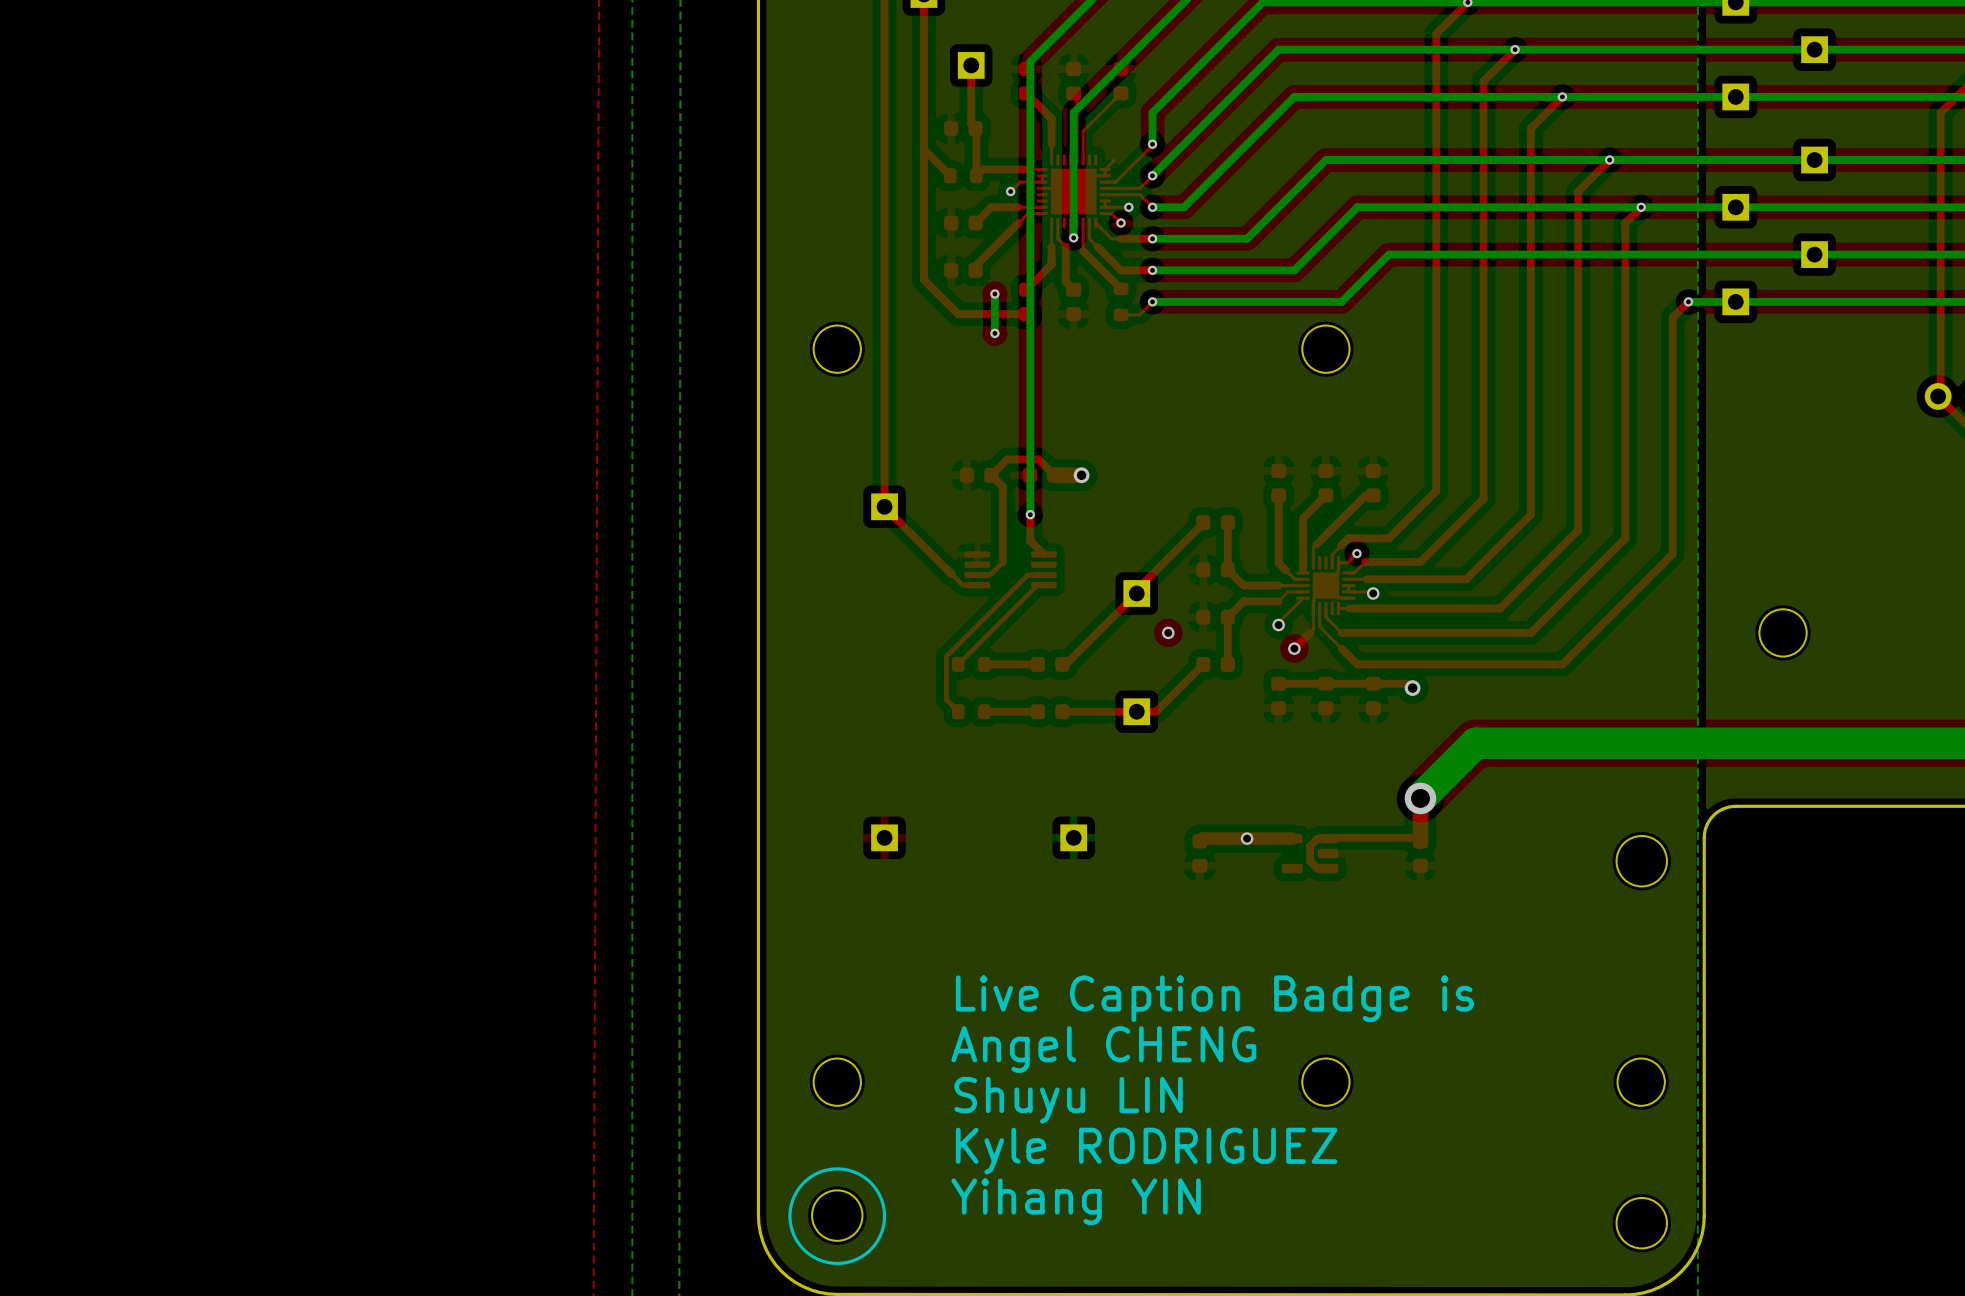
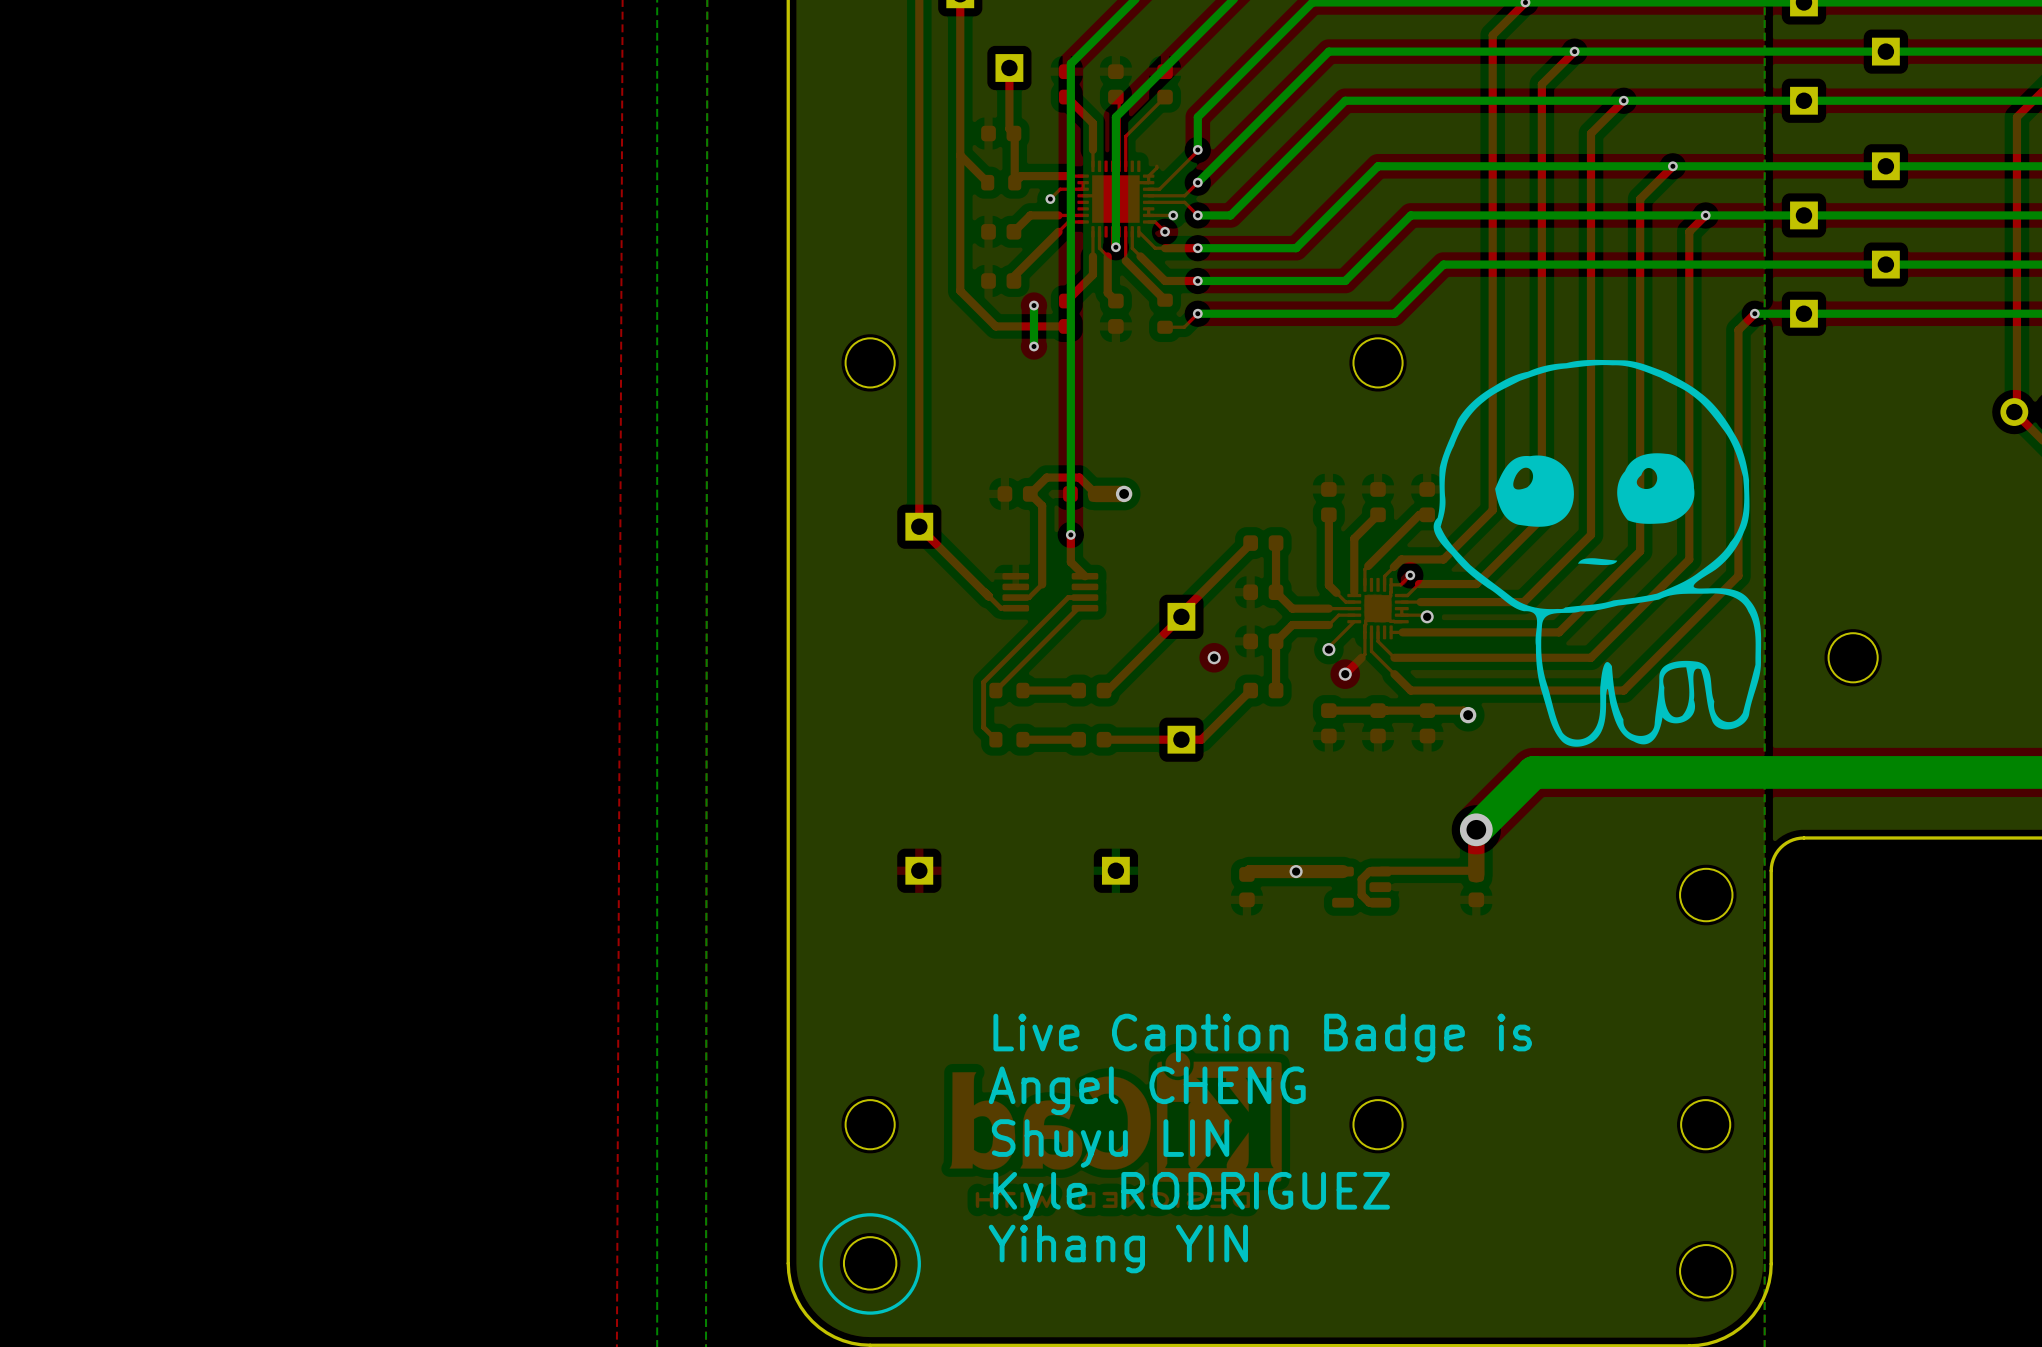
drawing: none -> [1433, 359, 1762, 747]
drawing: none -> [949, 1051, 1282, 1209]

